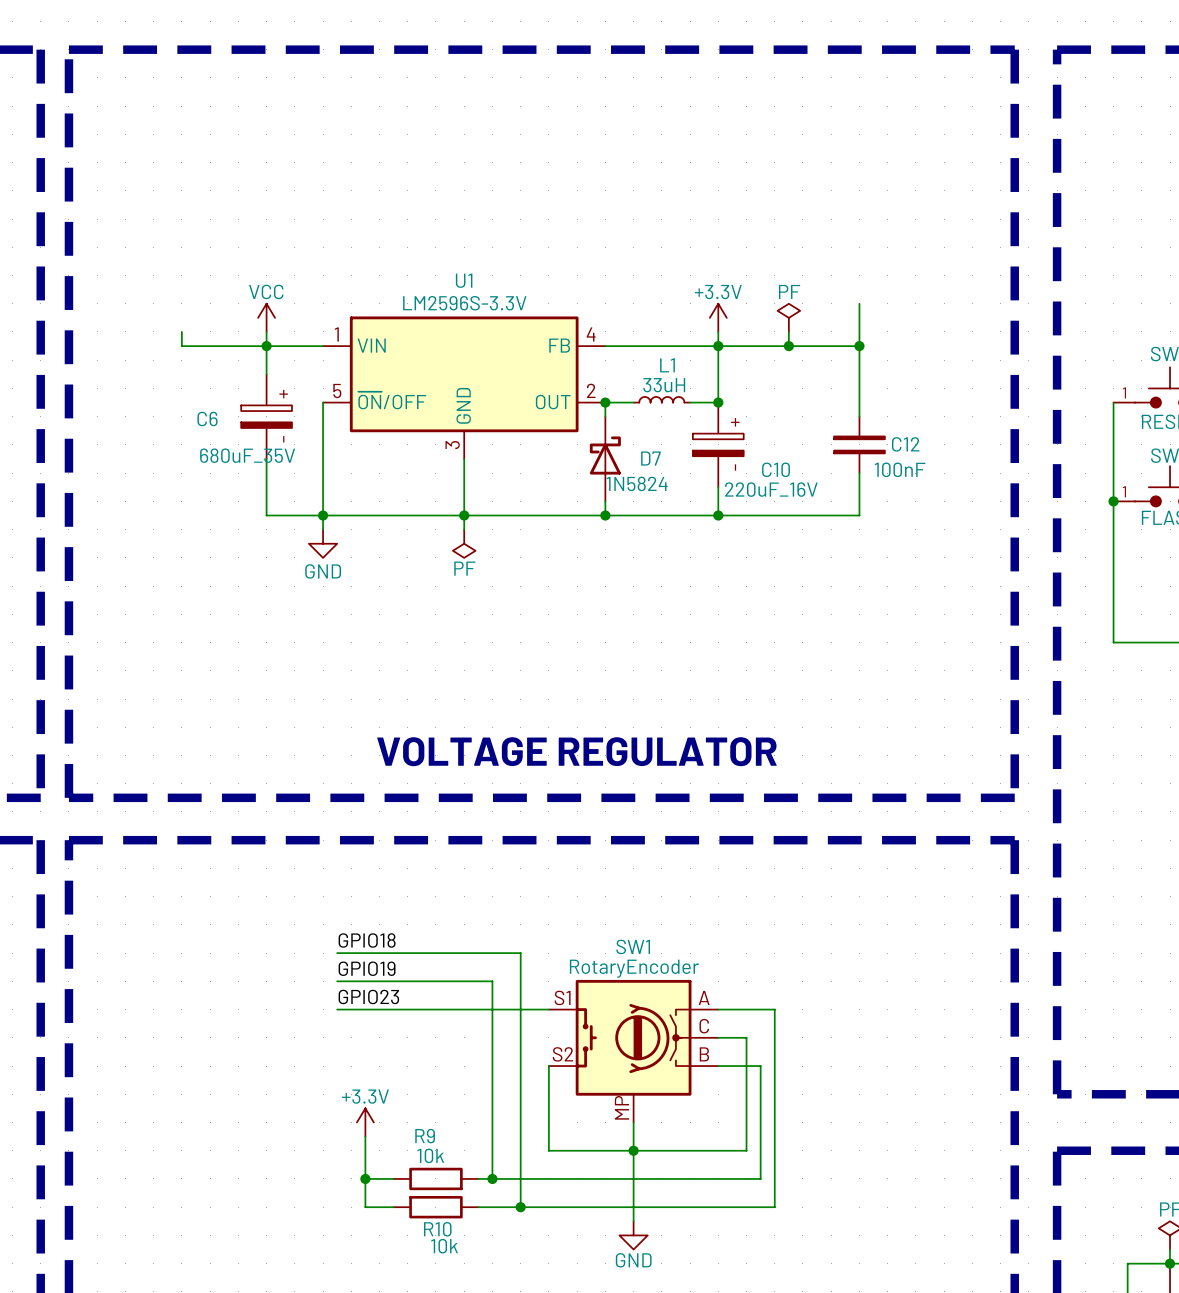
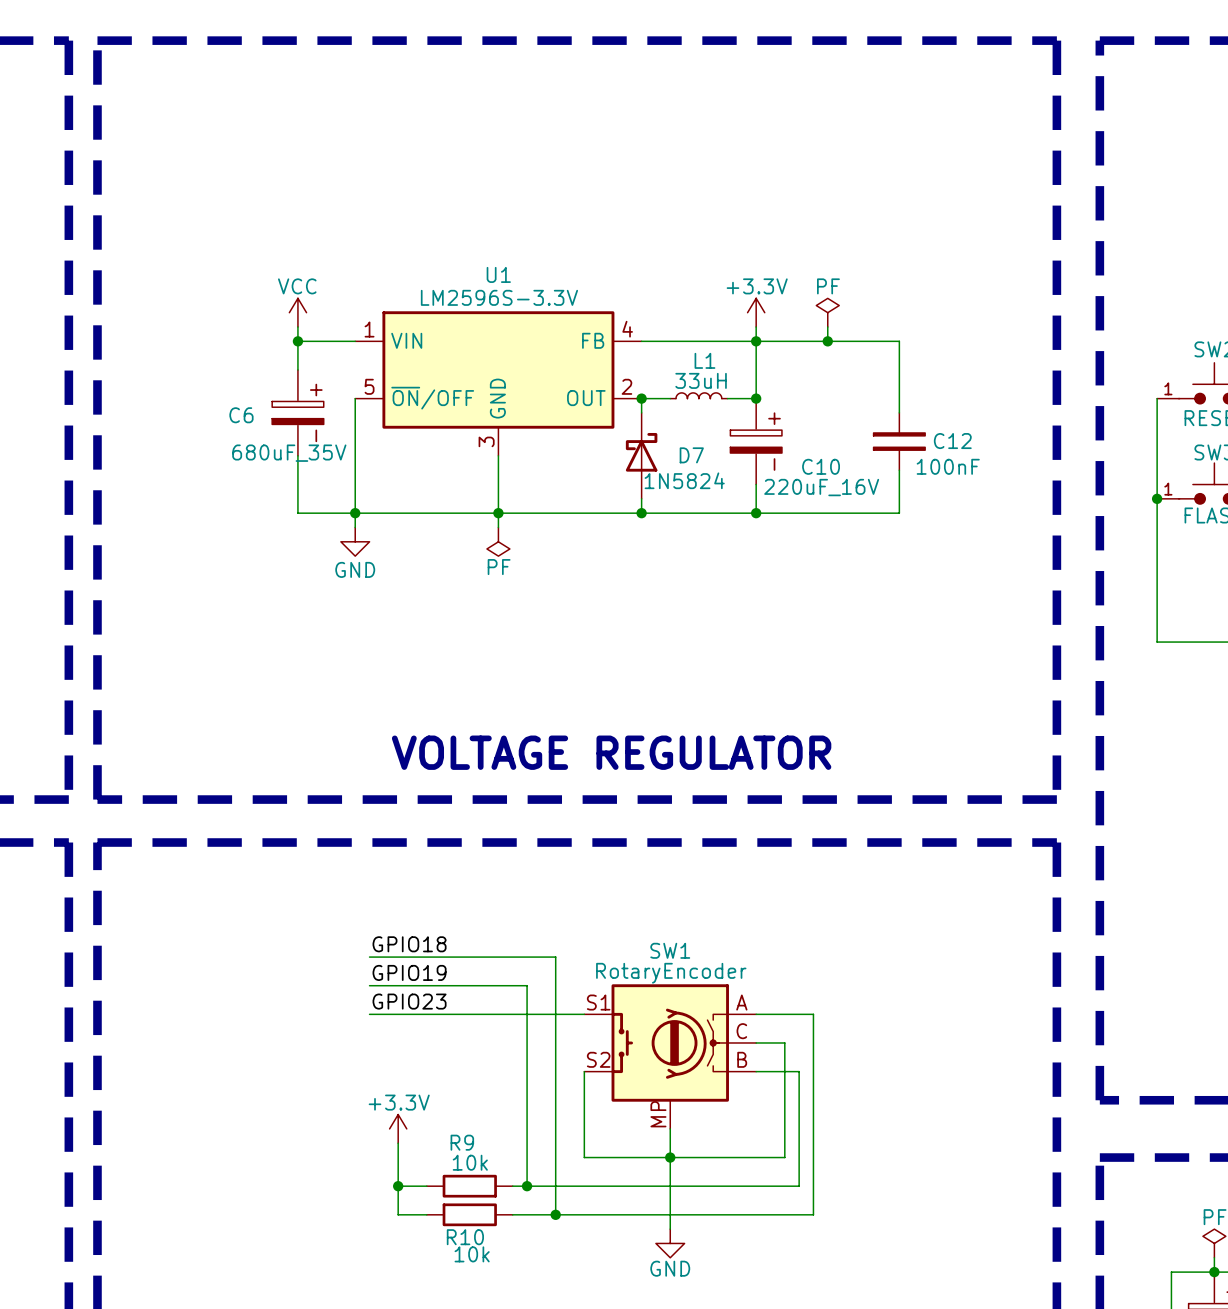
wire: (859, 303) (859, 346) -> none
wire: (181, 331) (181, 346) (266, 346) -> none
junction: (859, 346) -> none

